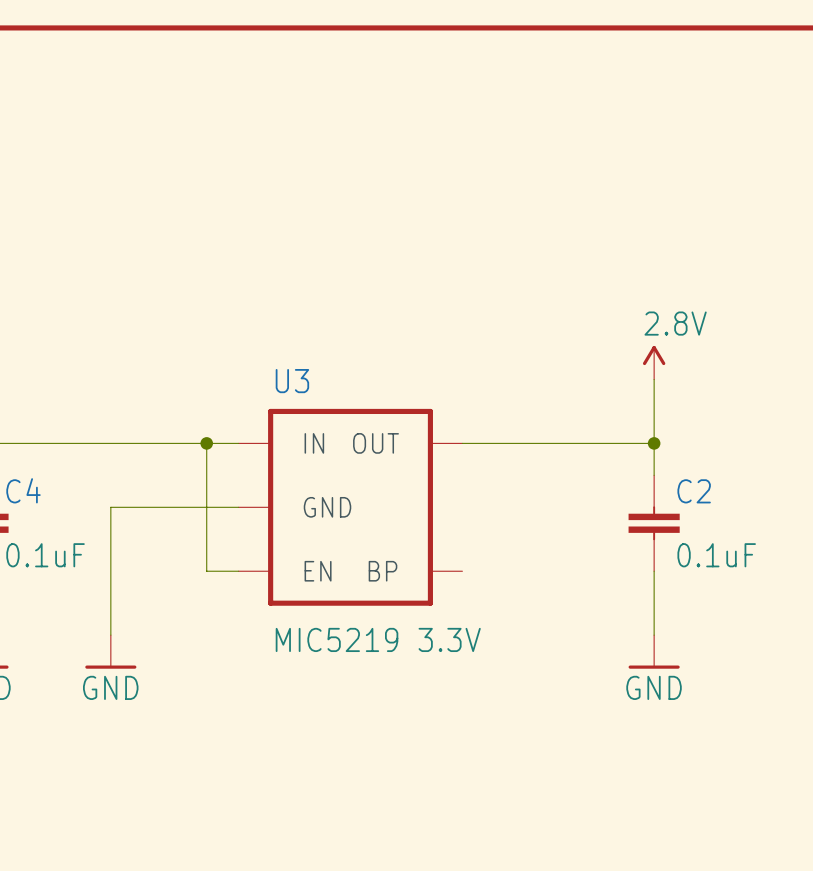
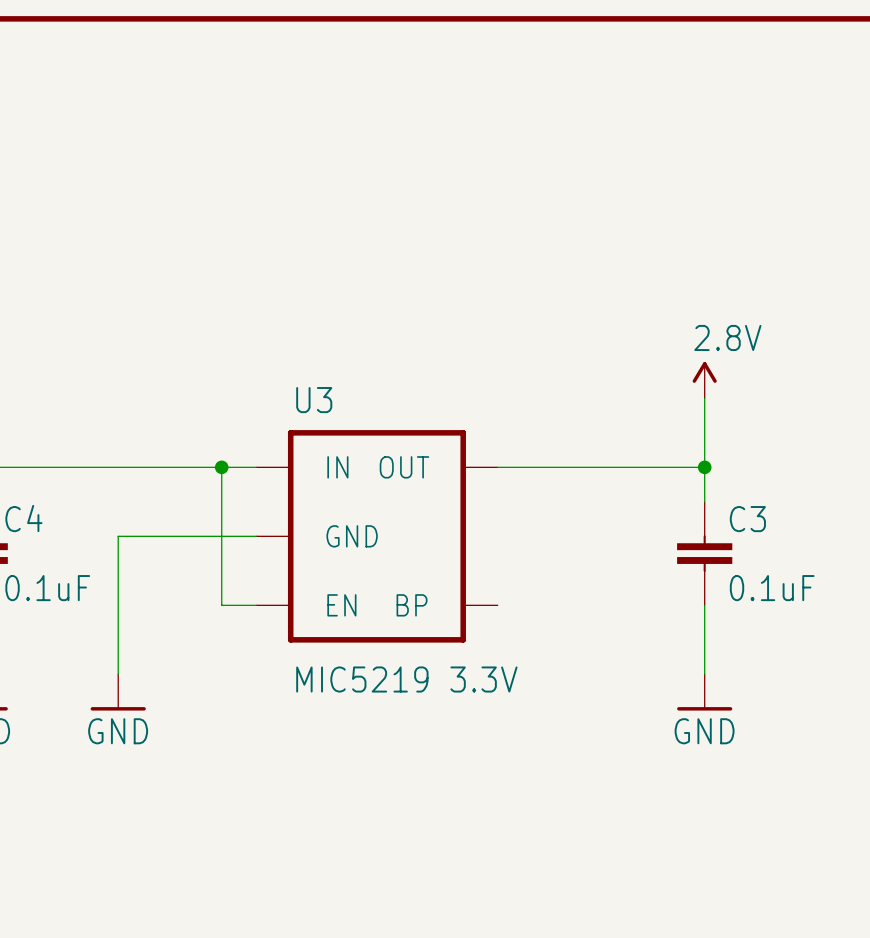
C2 name: C2 (694, 491) -> C3 (747, 519)

